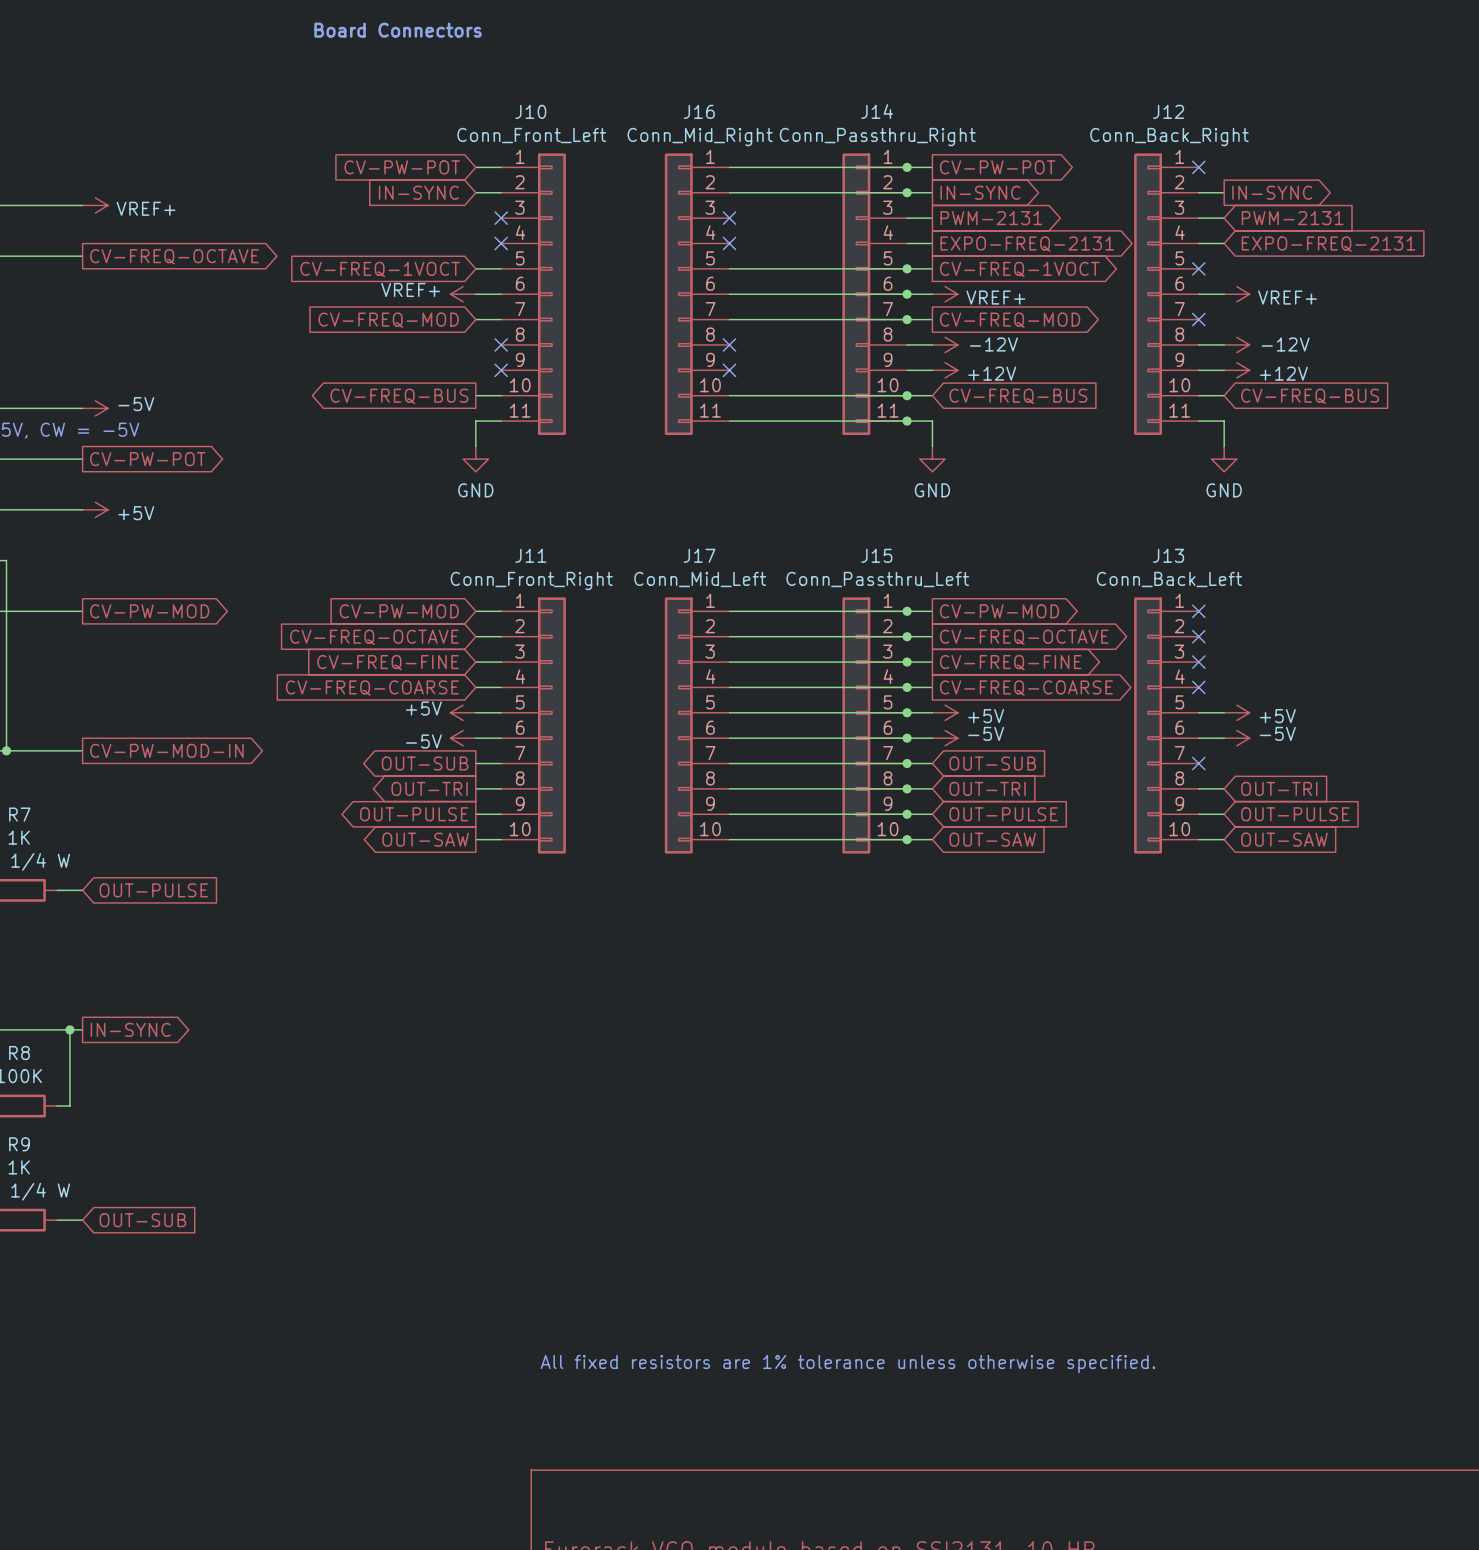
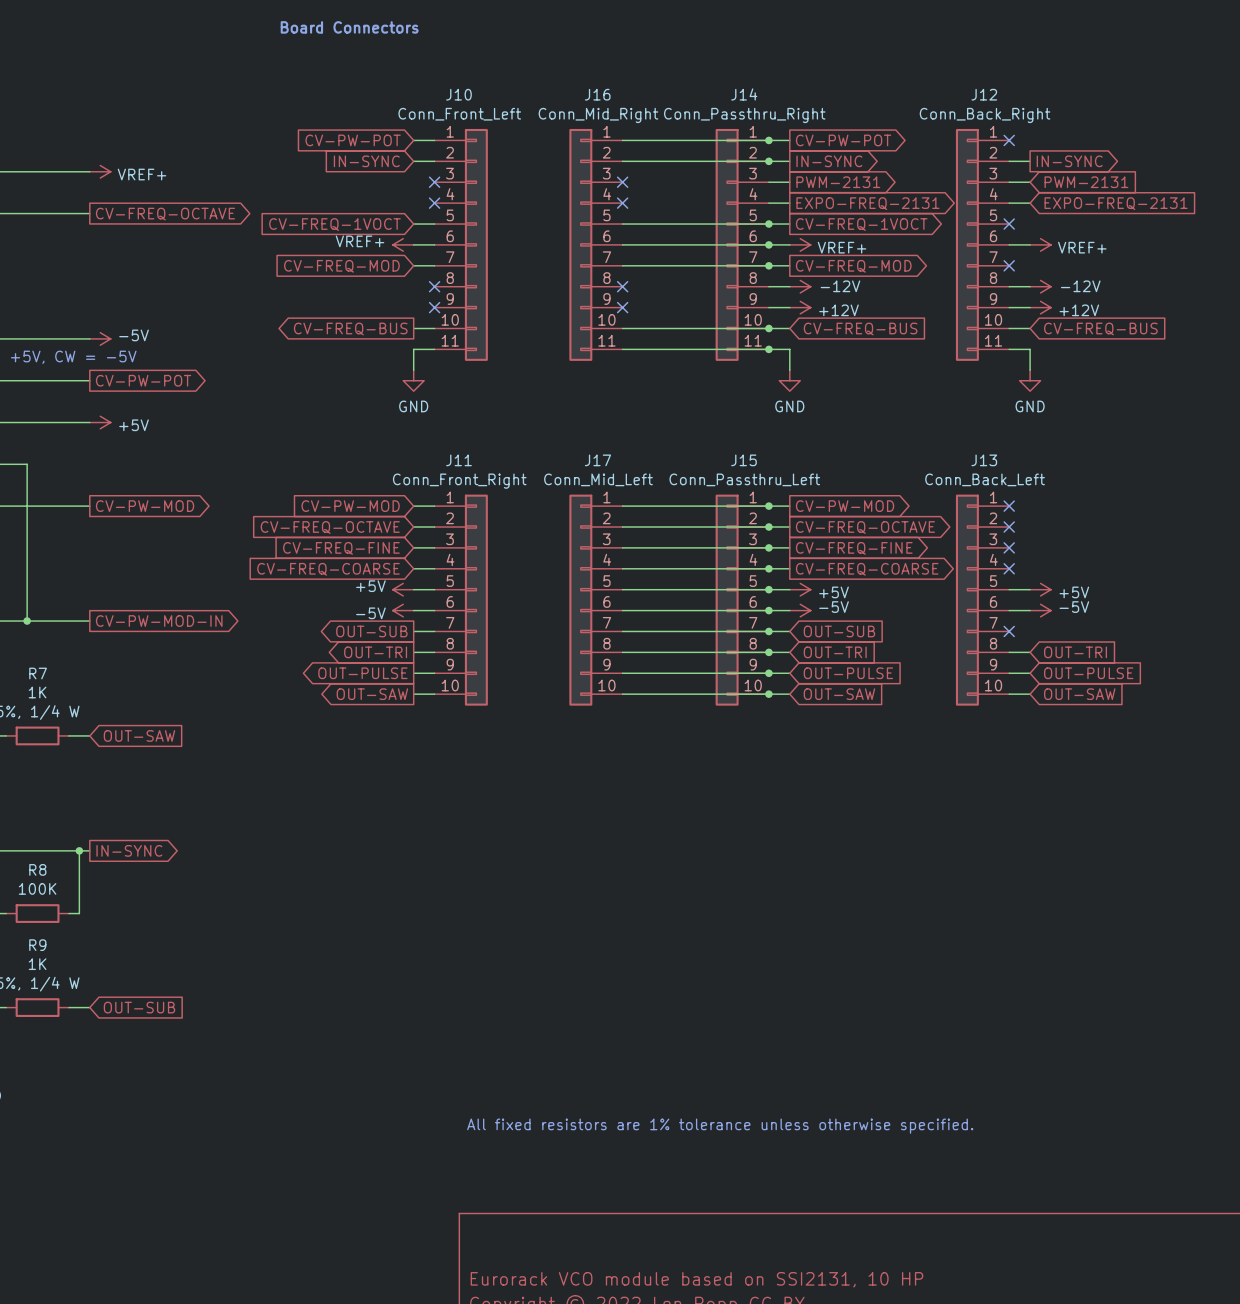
global label: OUT-PULSE (153, 890) -> OUT-SAW (139, 735)

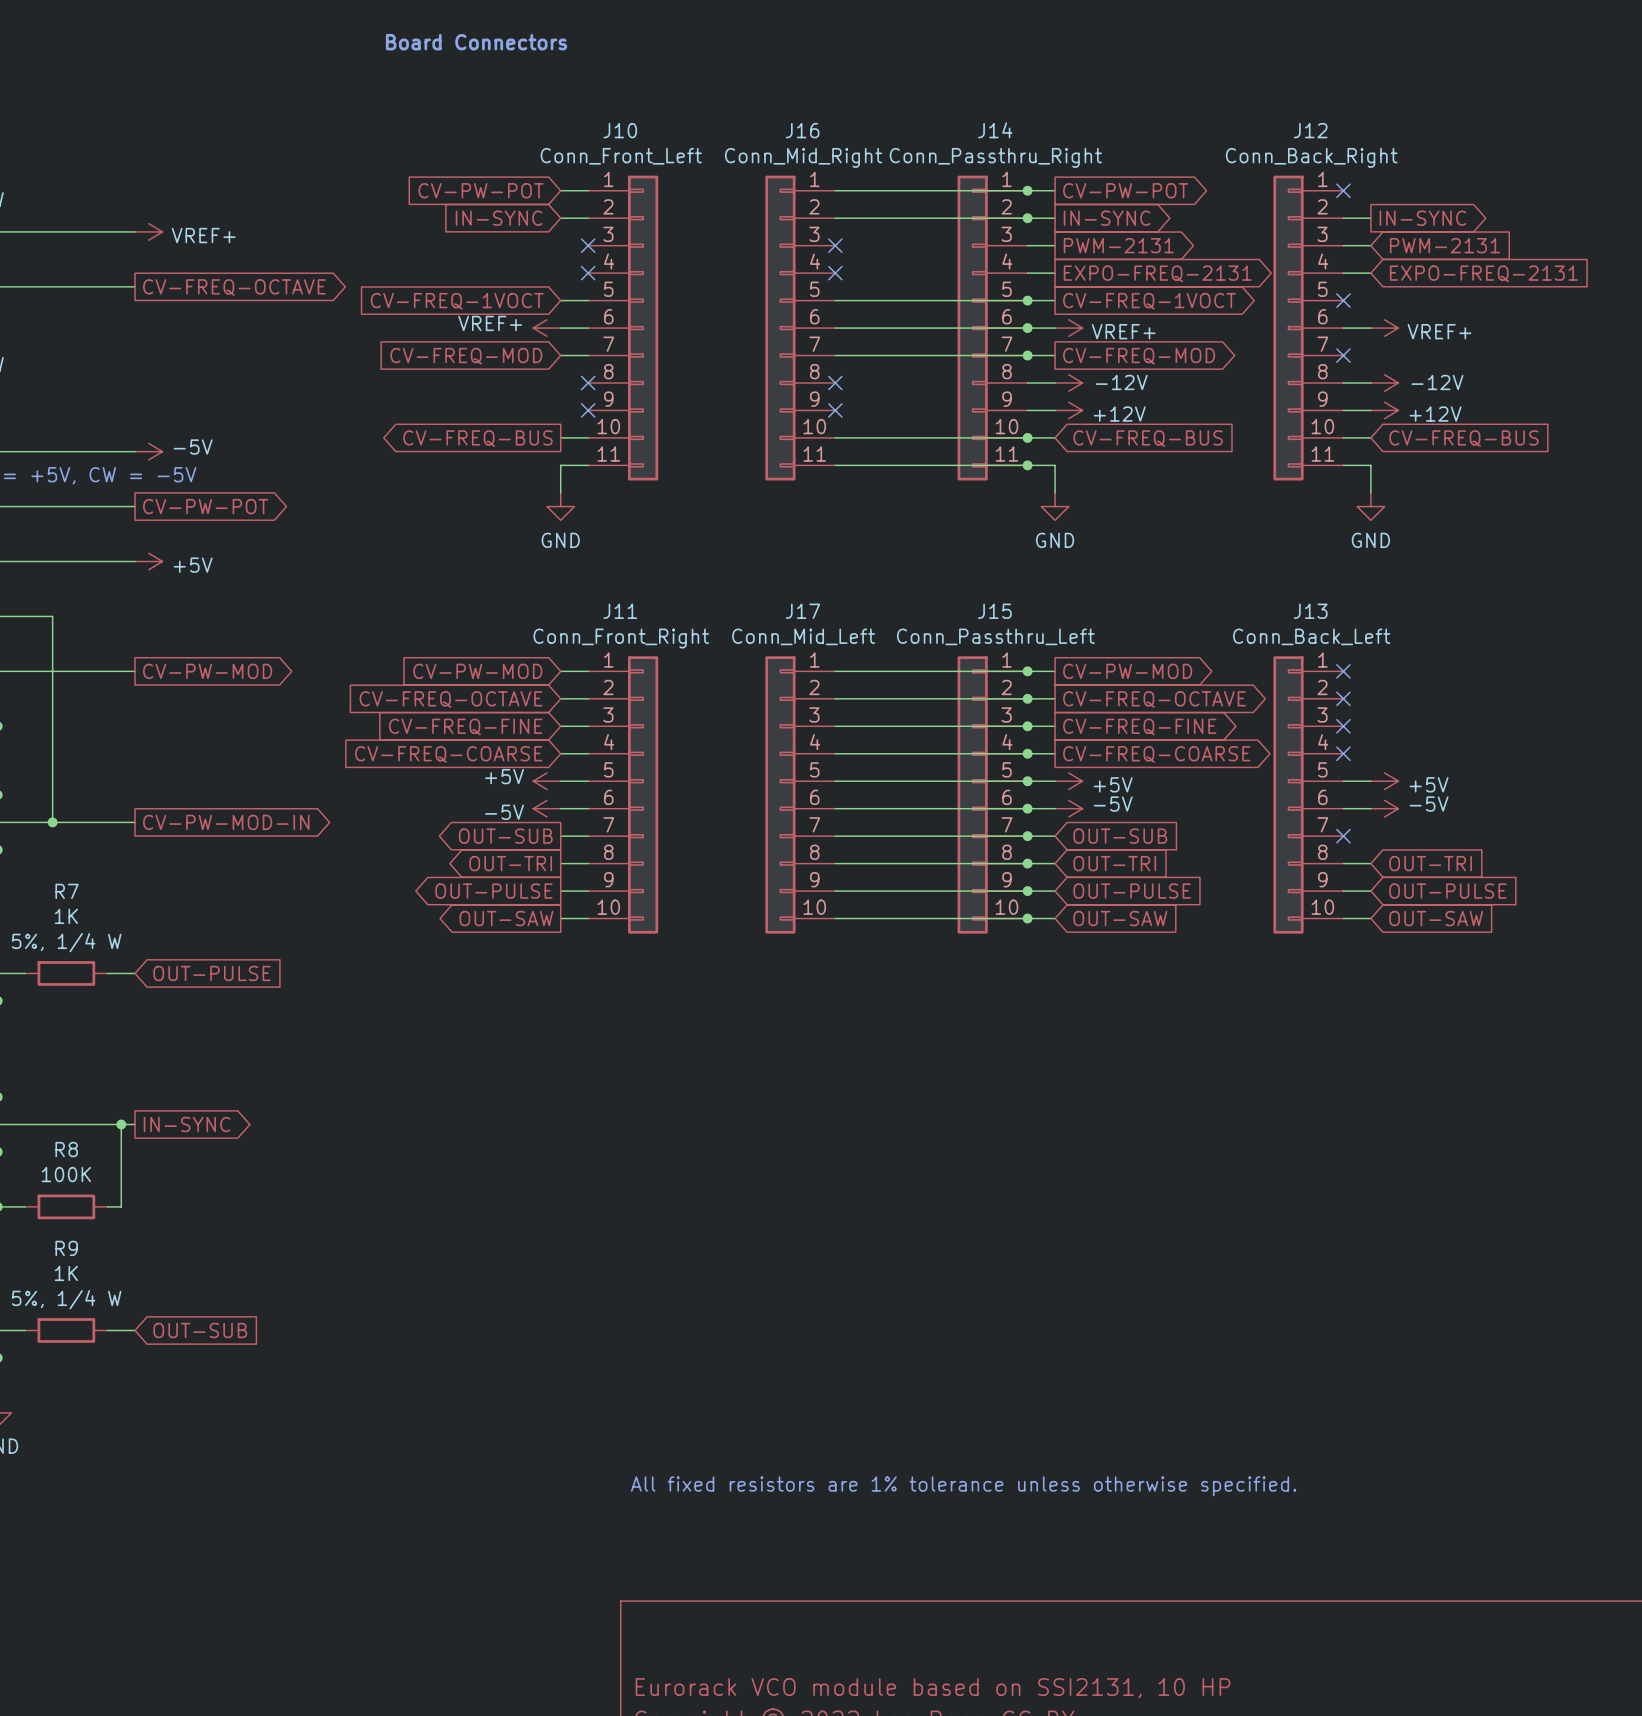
global label: OUT-SAW (139, 735) -> OUT-PULSE (212, 973)

